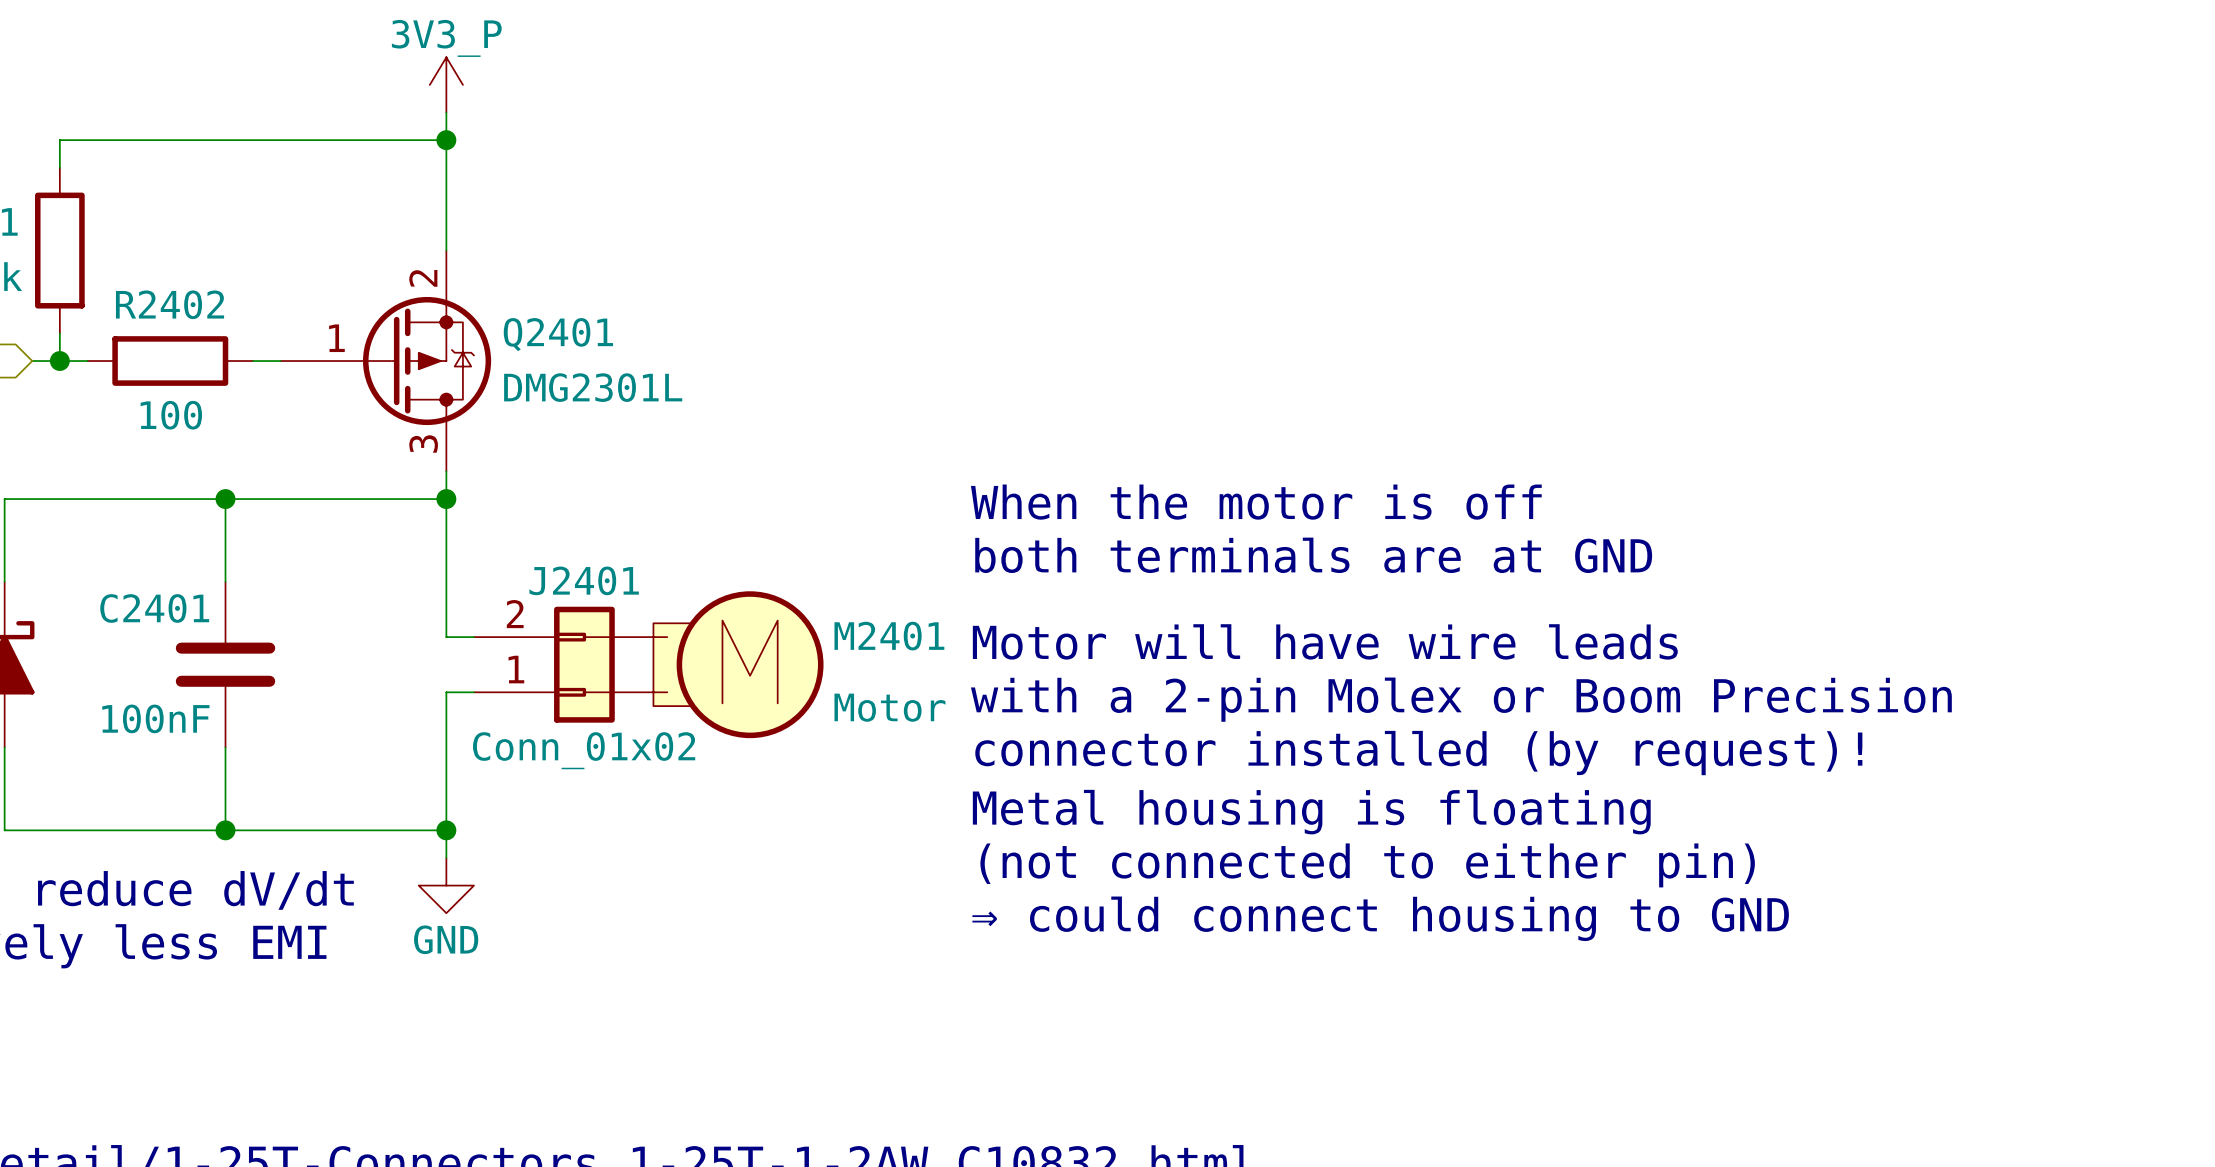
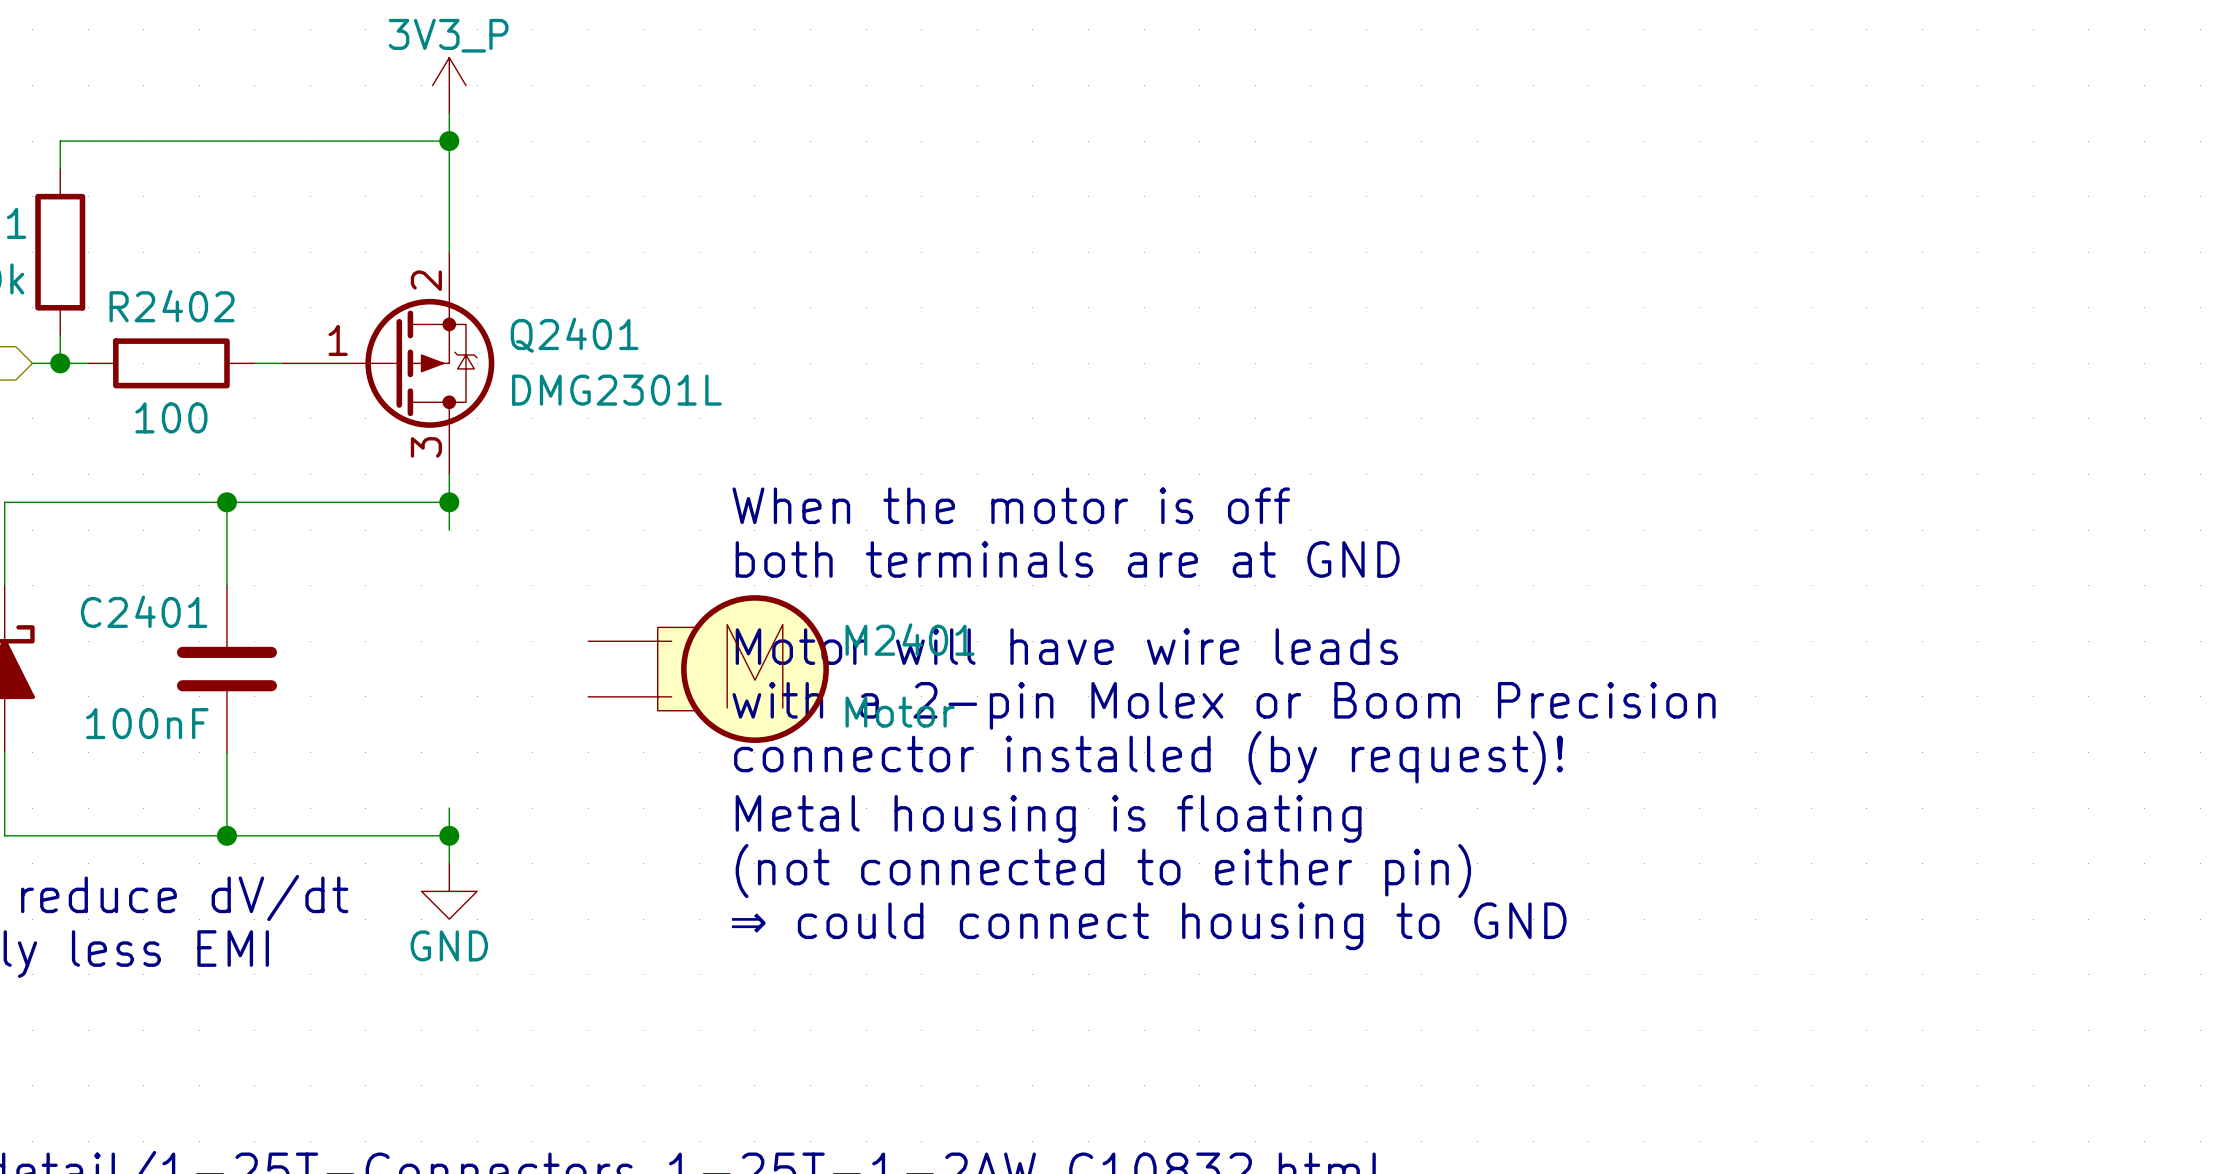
text position: When the motor is off (1256, 502) -> When the motor is off (1011, 505)
wire: (446, 526) (446, 637) (473, 637) -> none
text position: both terminals are at GND (1313, 555) -> both terminals are at GND (1067, 559)
text position: Motor will have wire leads (1325, 641) -> Motor will have wire leads (1066, 646)
J2401: Conn_01x02 (544, 664) -> none
wire: (473, 692) (446, 692) (446, 802) -> none
text position: with a 2-pin Molex or Boom Precision (1461, 699) -> with a 2-pin Molex or Boom Precision (1224, 705)
text position: connector installed (by request)! (1418, 753) -> connector installed (by request)! (1148, 757)
text position: Metal housing is floating (1311, 812) -> Metal housing is floating (1048, 818)
text position: (not connected to either pin) (1367, 865) -> (not connected to either pin) (1103, 871)
text position: ⇒ could connect housing to GND (1380, 918) -> ⇒ could connect housing to GND (1148, 926)

